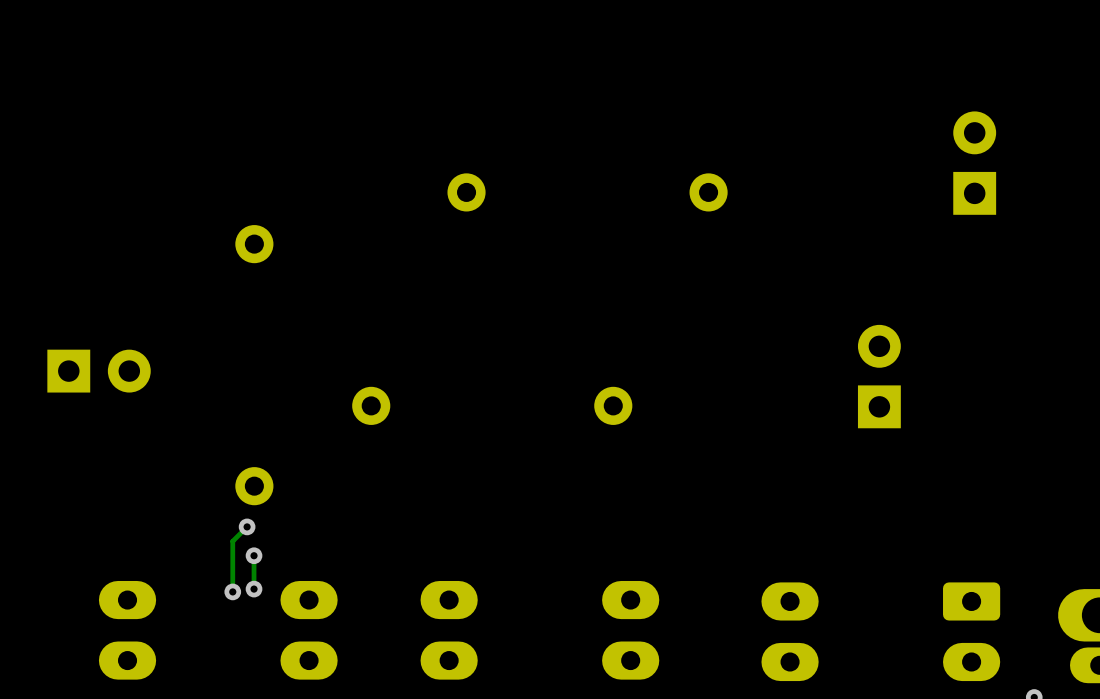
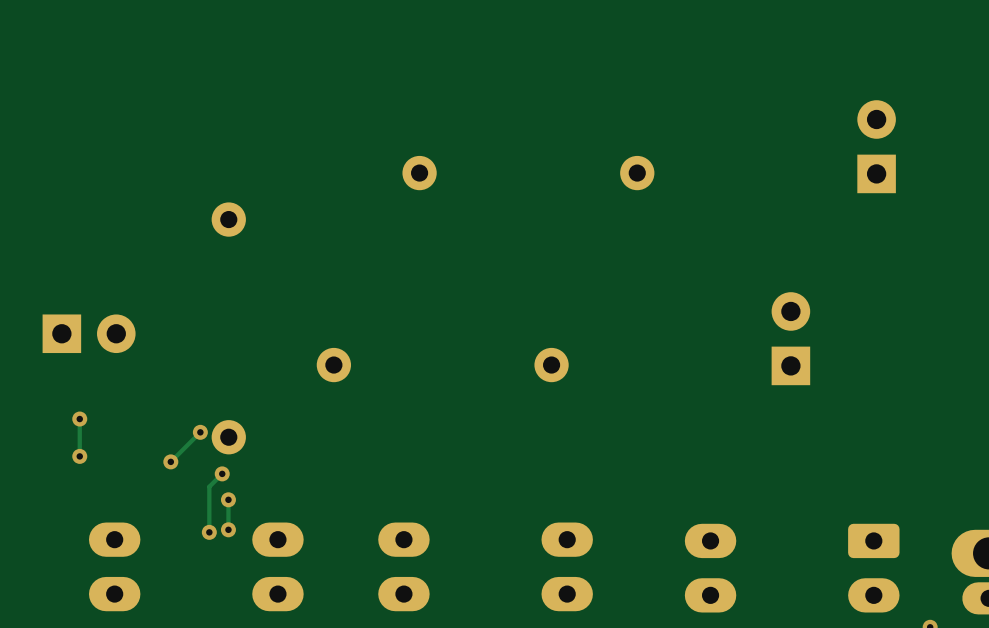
track: none -> (79, 419) (79, 456)
via: none -> (79, 419)
track: none -> (200, 432) (170, 461)
via: none -> (200, 432)
via: none -> (79, 456)
via: none -> (170, 461)

